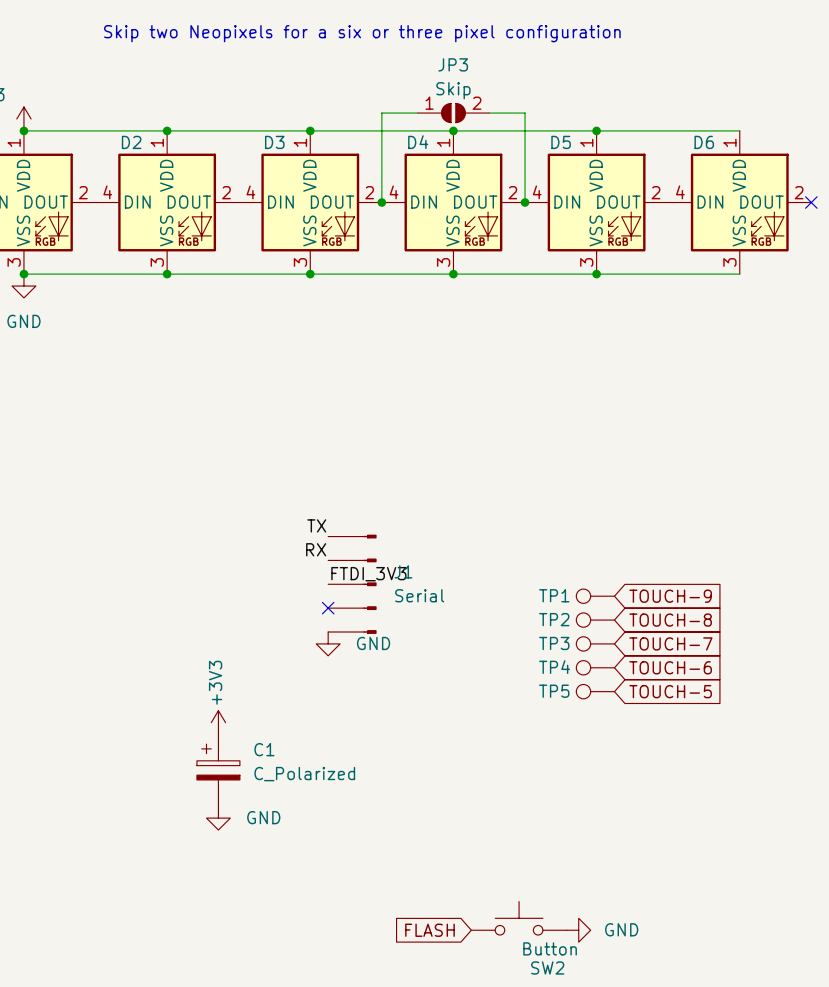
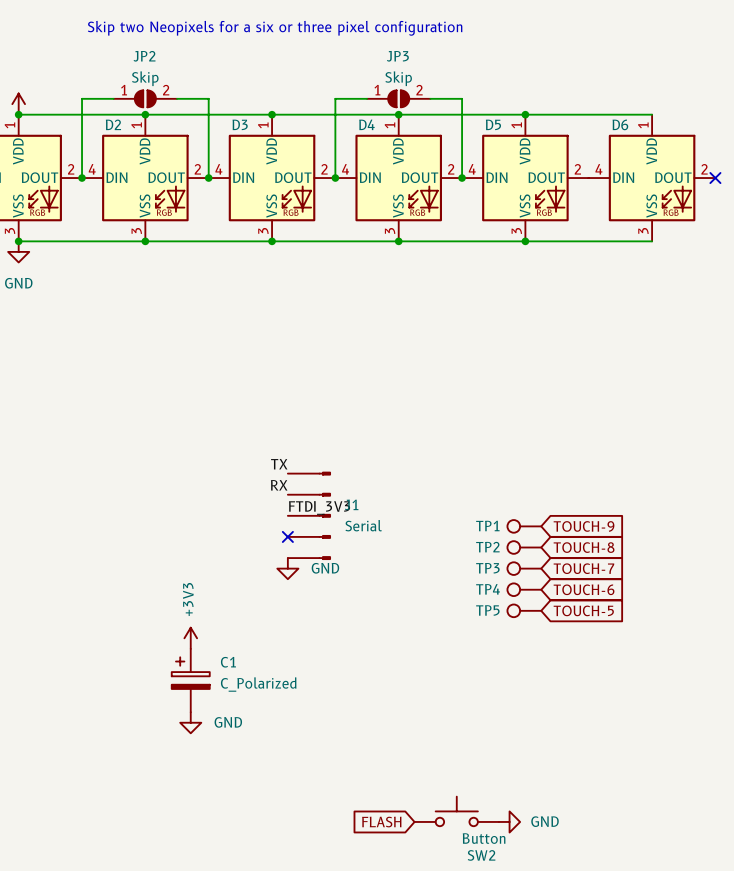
wire: none -> (113, 98) (82, 98) (82, 178)
JP2: none -> Skip (145, 98)
wire: none -> (177, 98) (208, 98) (208, 178)
junction: none -> (82, 178)
junction: none -> (208, 178)

